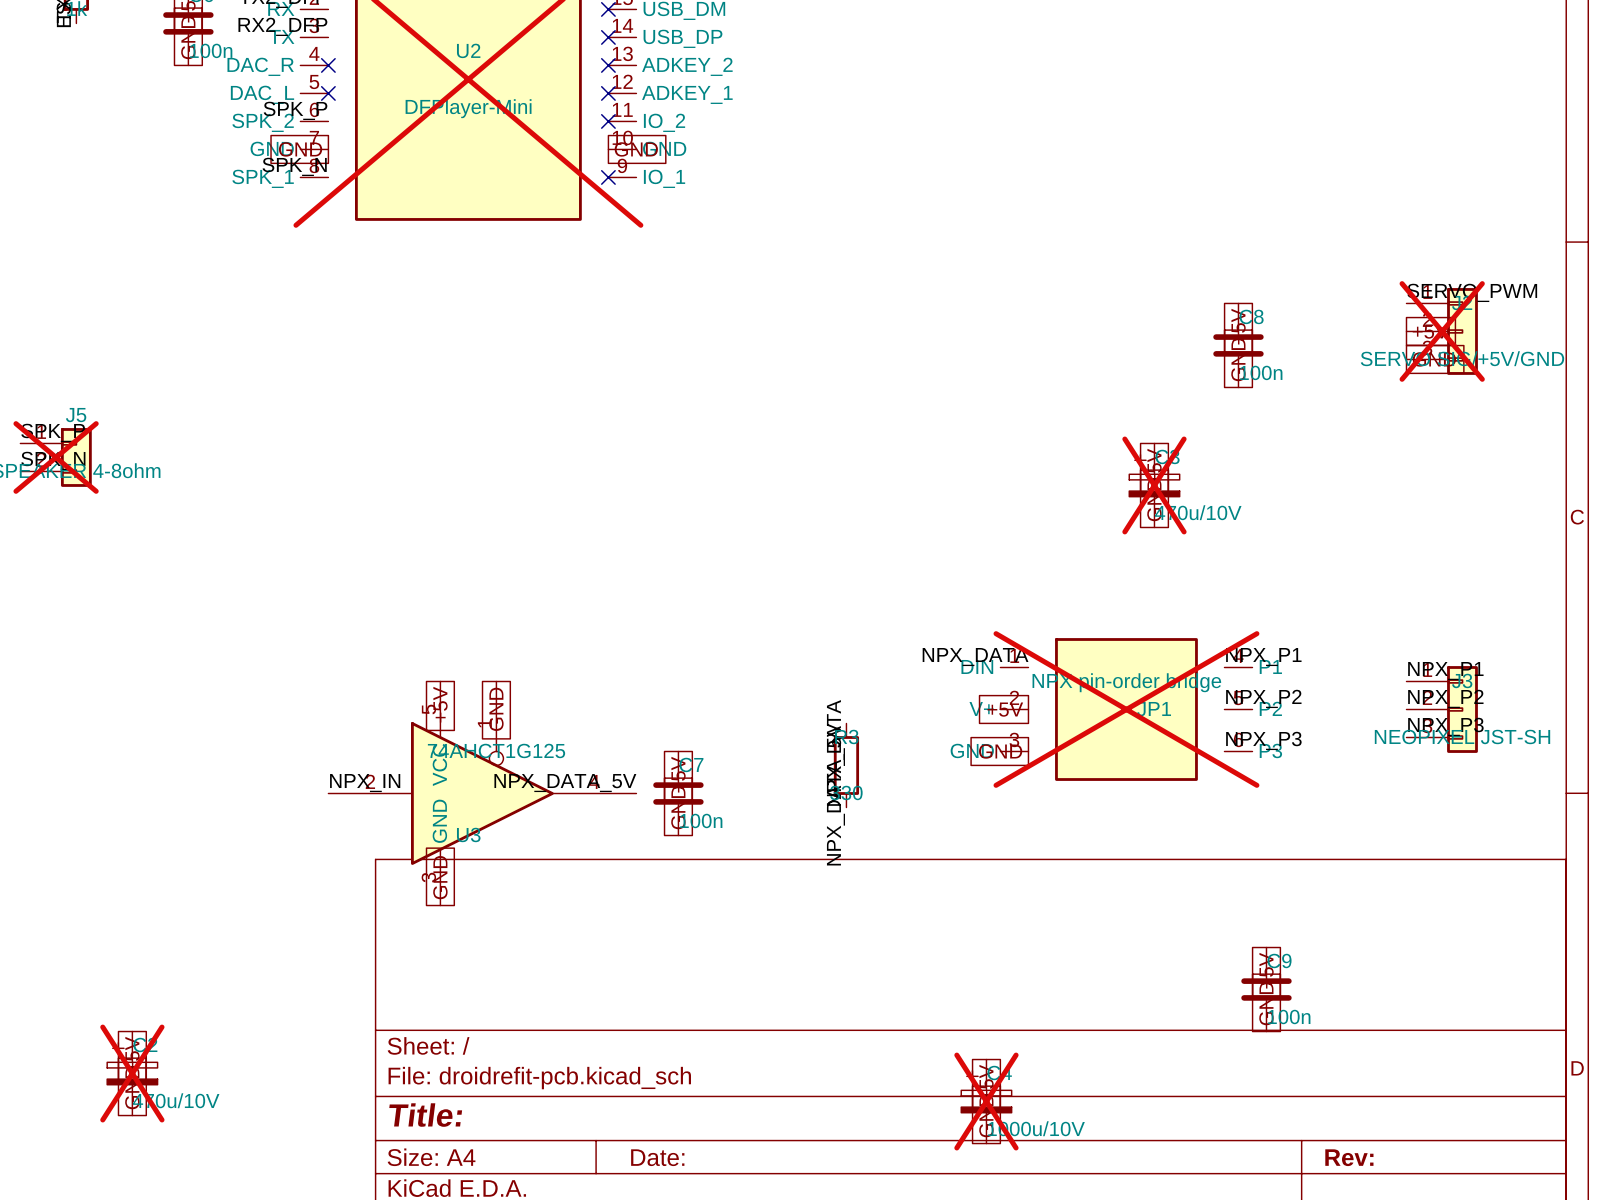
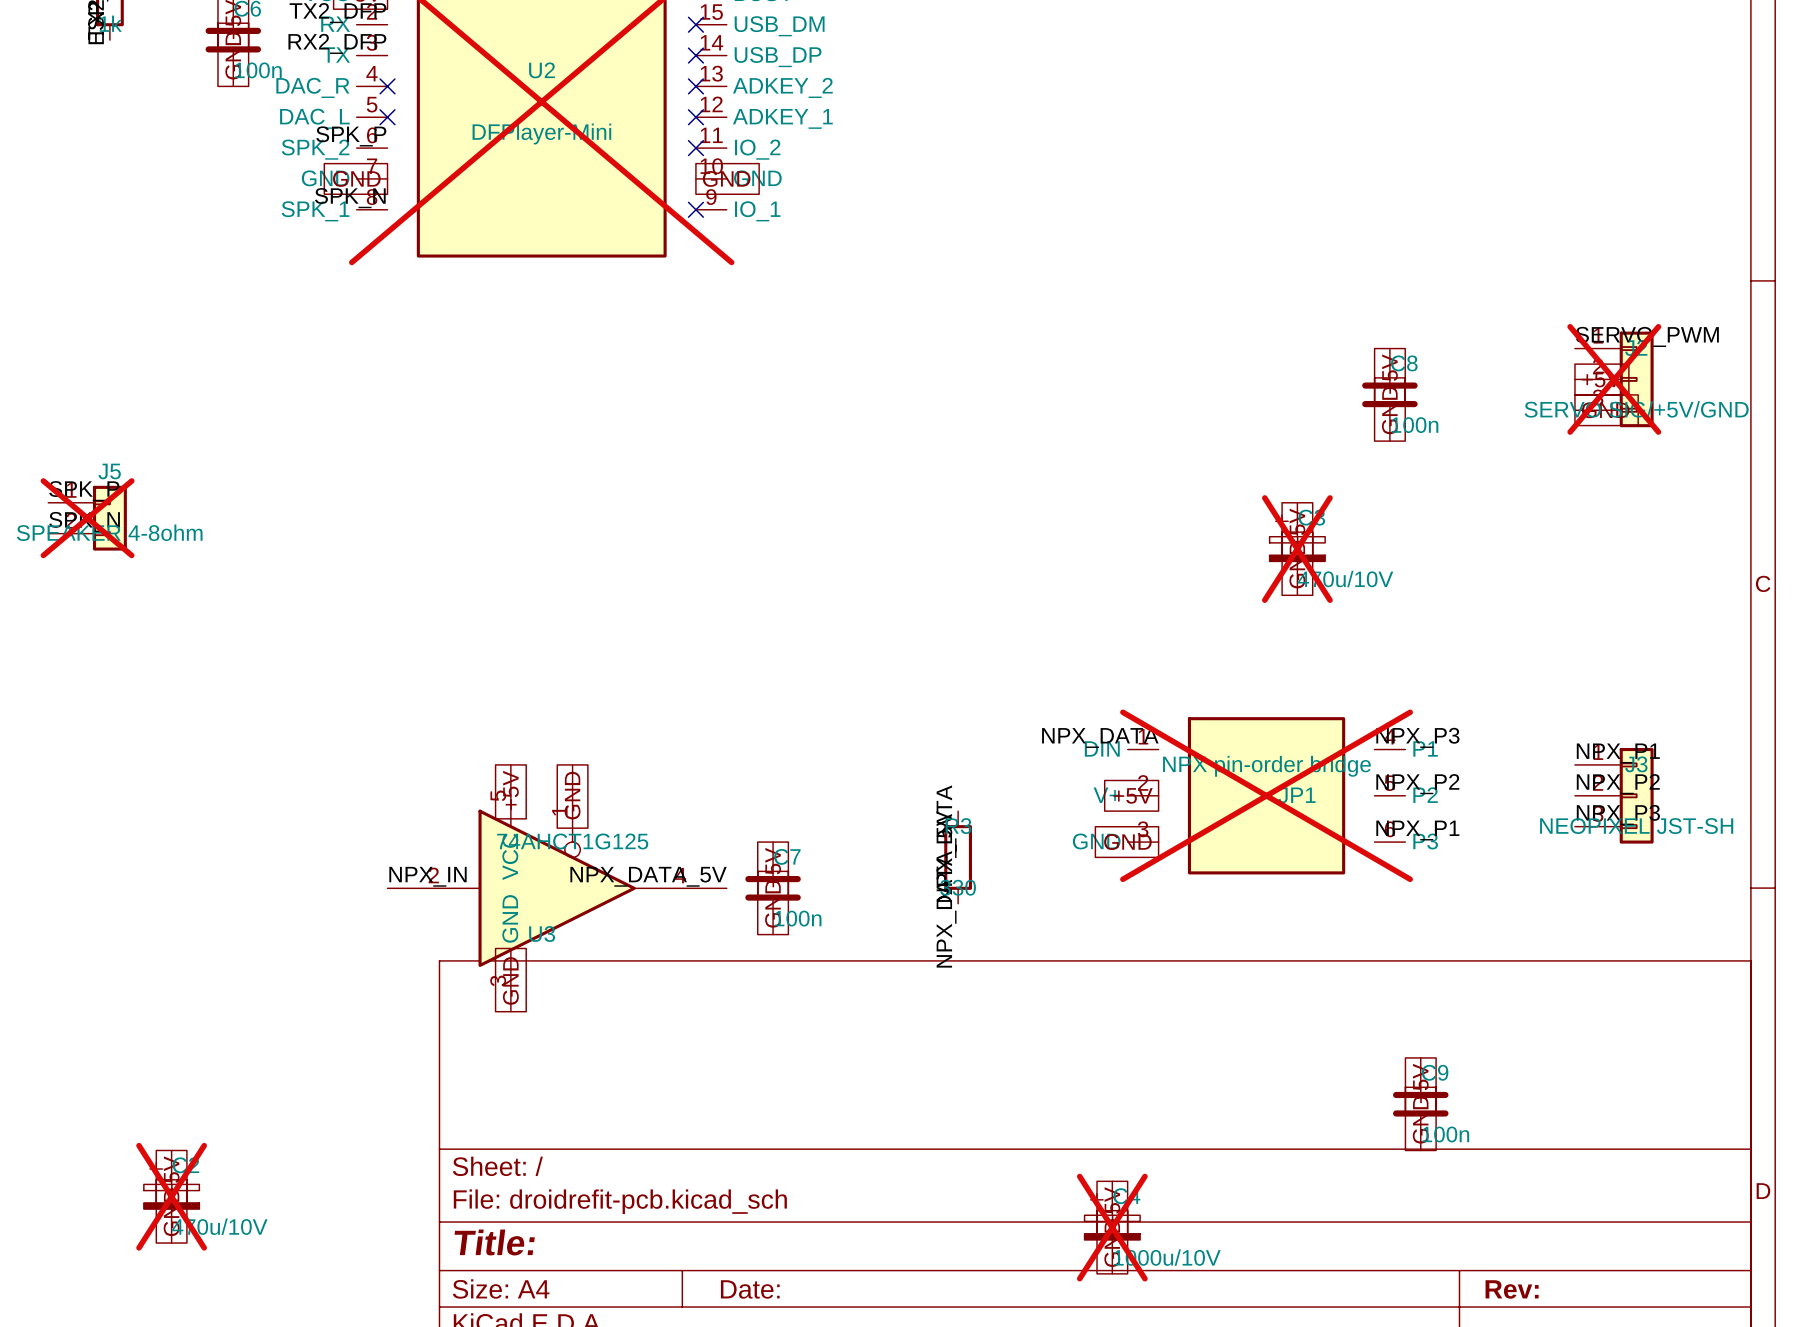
label: NPX_P1 (1263, 657) -> NPX_P3 (1417, 737)
label: NPX_P3 (1263, 740) -> NPX_P1 (1417, 830)

